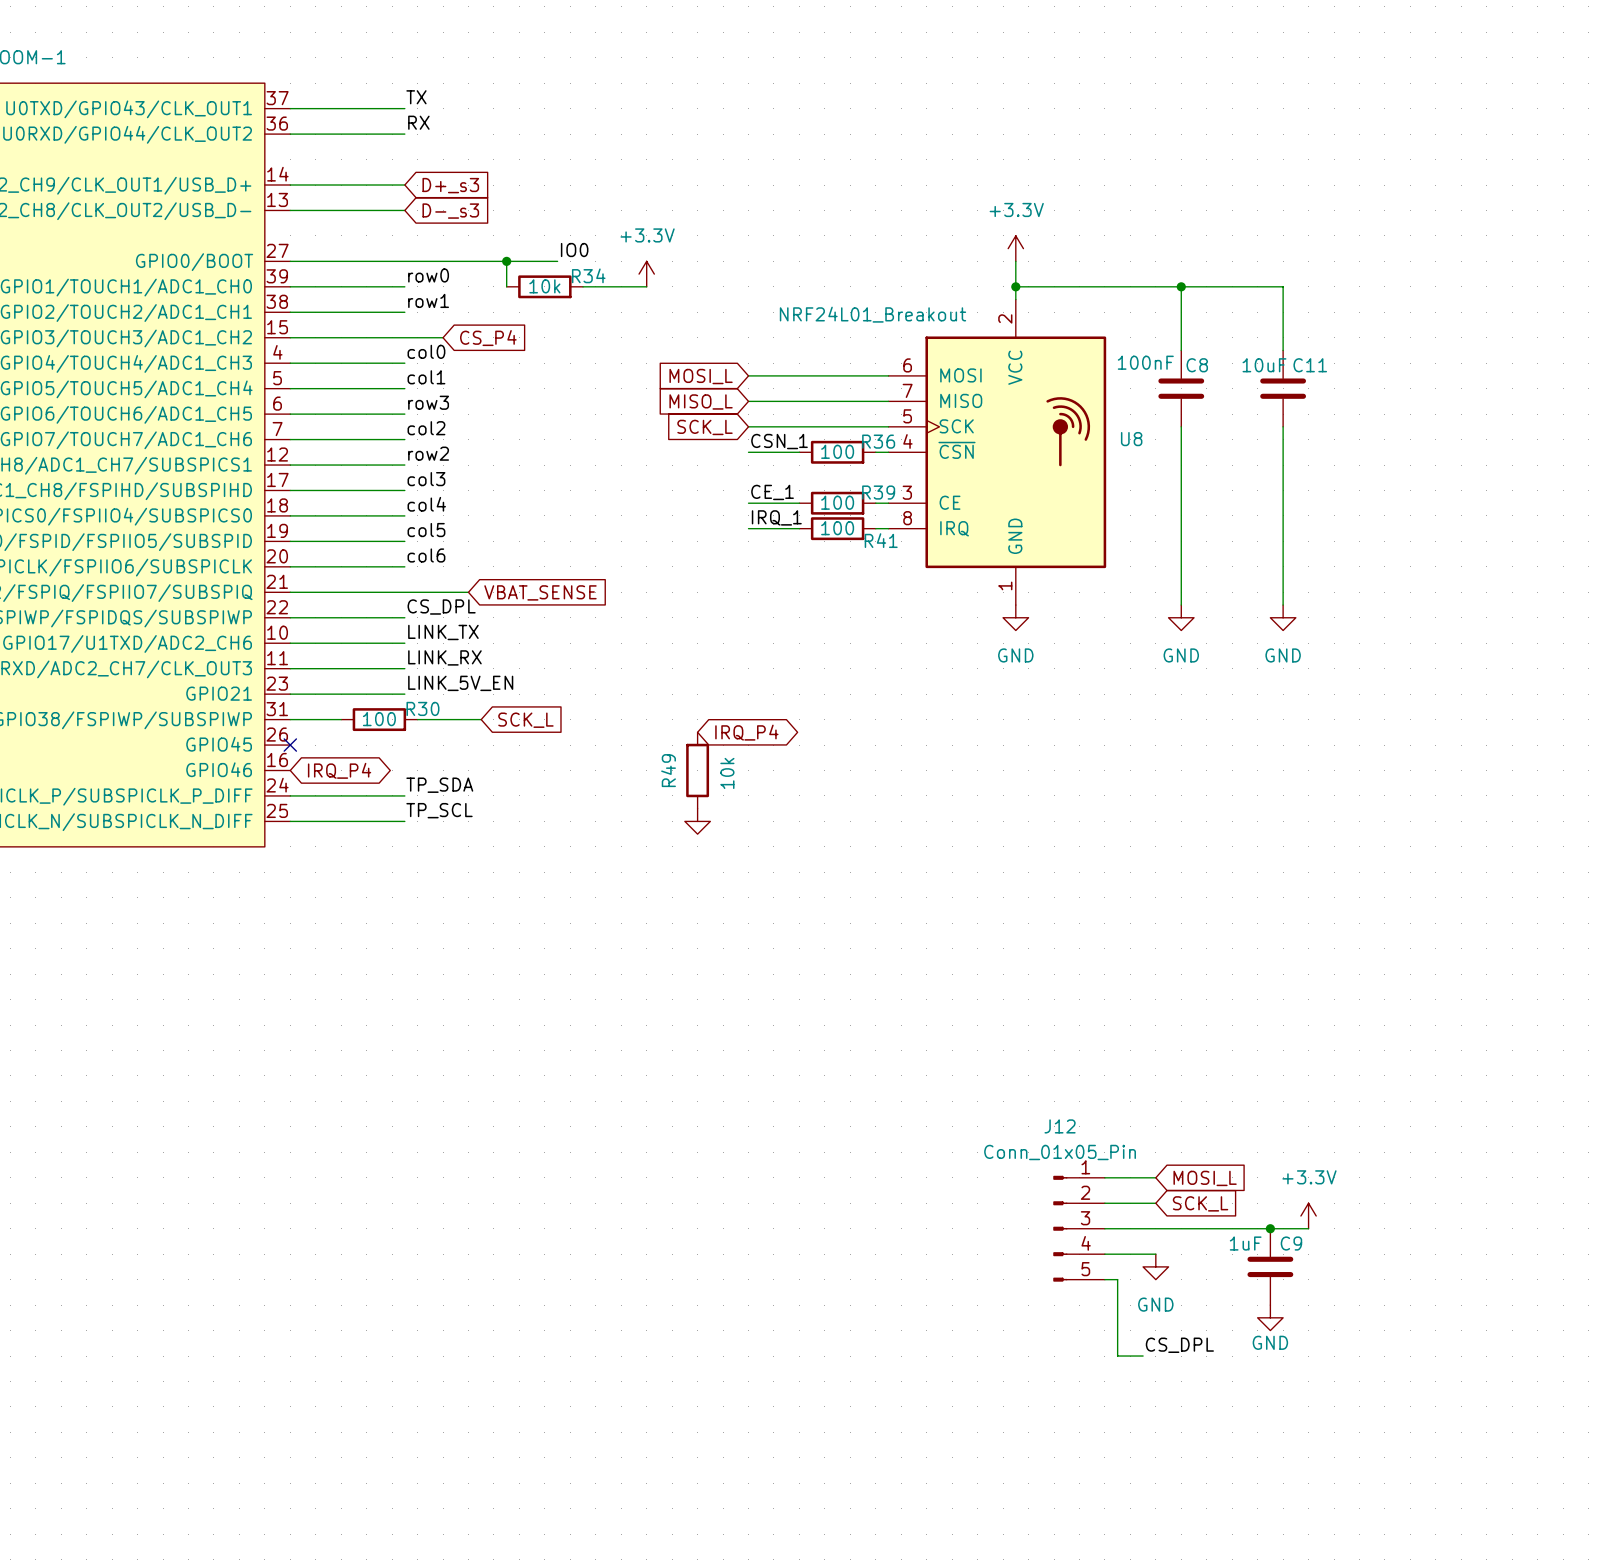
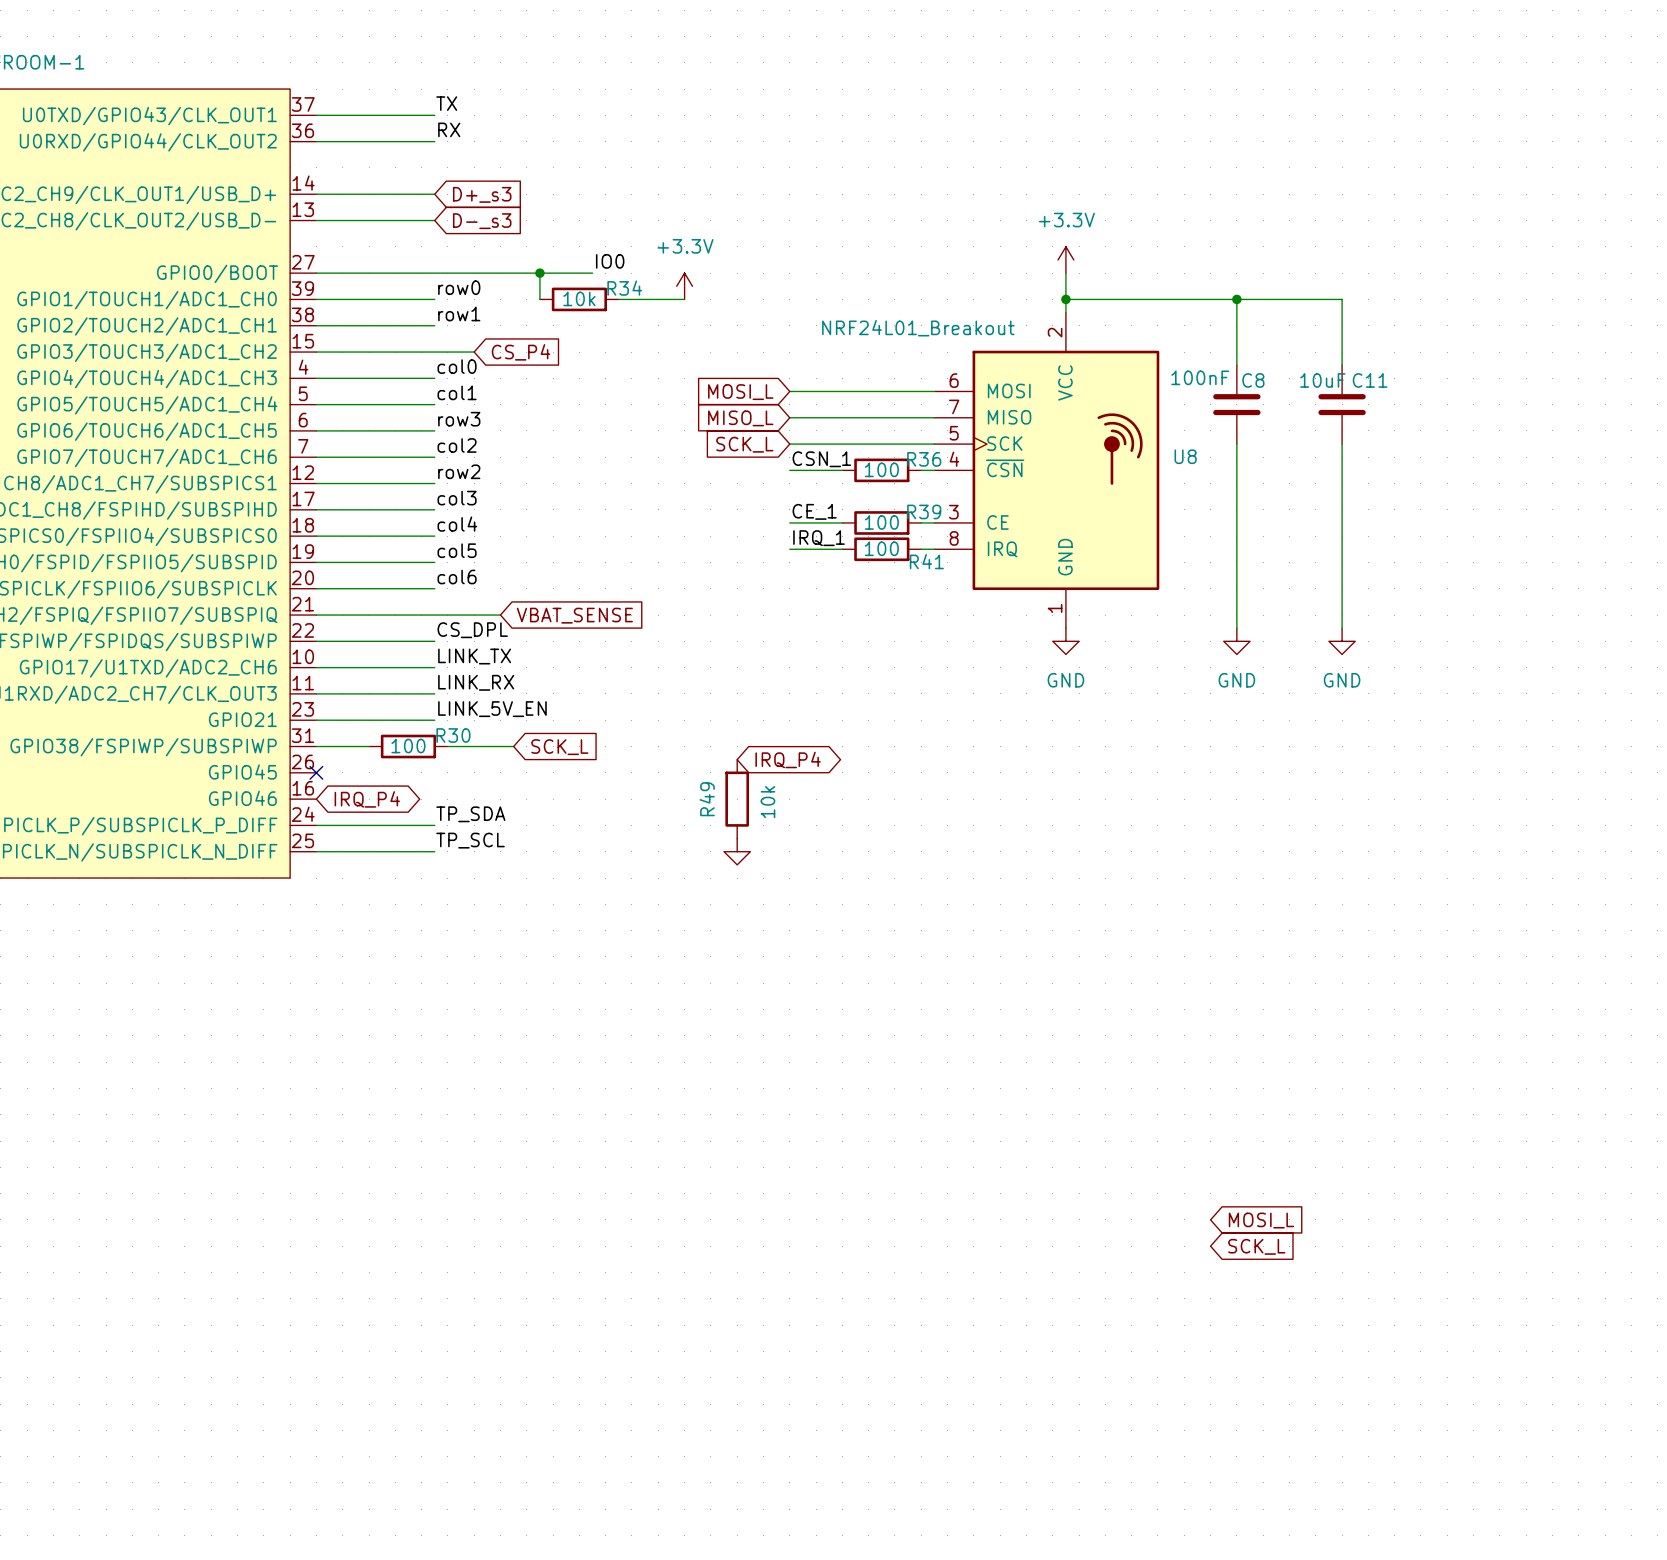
wire: (1104, 1177) (1155, 1177) -> none
wire: (1104, 1203) (1155, 1203) -> none
power symbol: +3.3V (1308, 1216) -> none
J12: Conn_01x05_Pin (1079, 1228) -> none
wire: (1104, 1228) (1308, 1228) -> none
junction: (1270, 1228) -> none
wire: (1104, 1254) (1155, 1254) -> none
power symbol: GND (1155, 1266) -> none
C9: 1uF (1270, 1266) -> none
wire: (1104, 1279) (1117, 1279) (1117, 1356) (1143, 1356) -> none
power symbol: GND (1270, 1317) -> none
label: CS_DPL (1179, 1345) -> none

